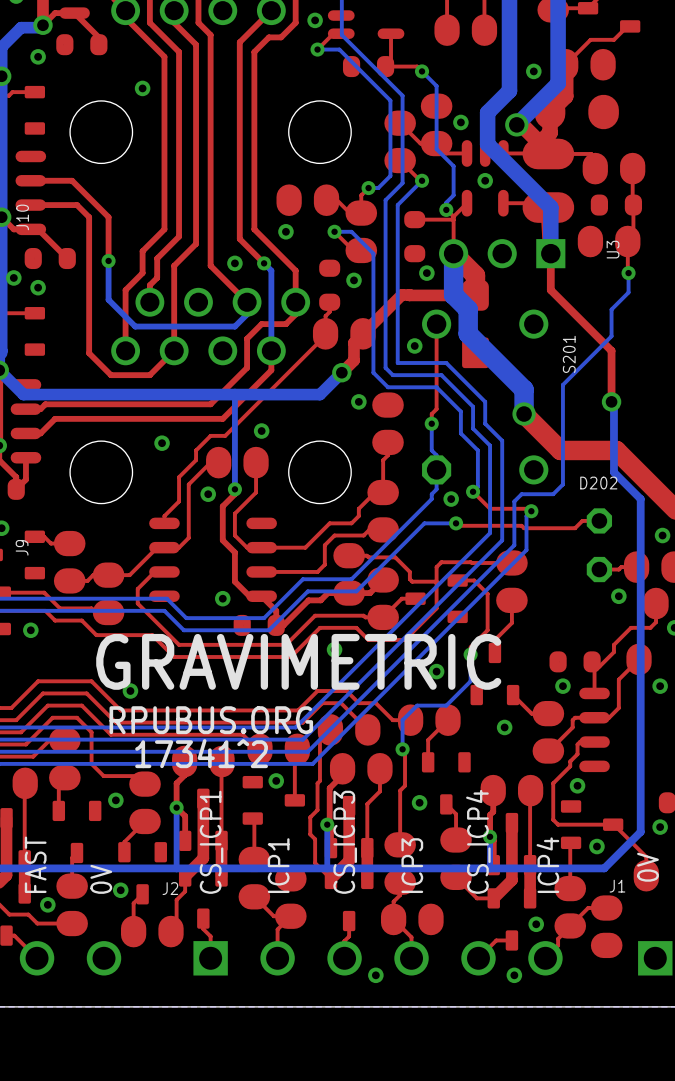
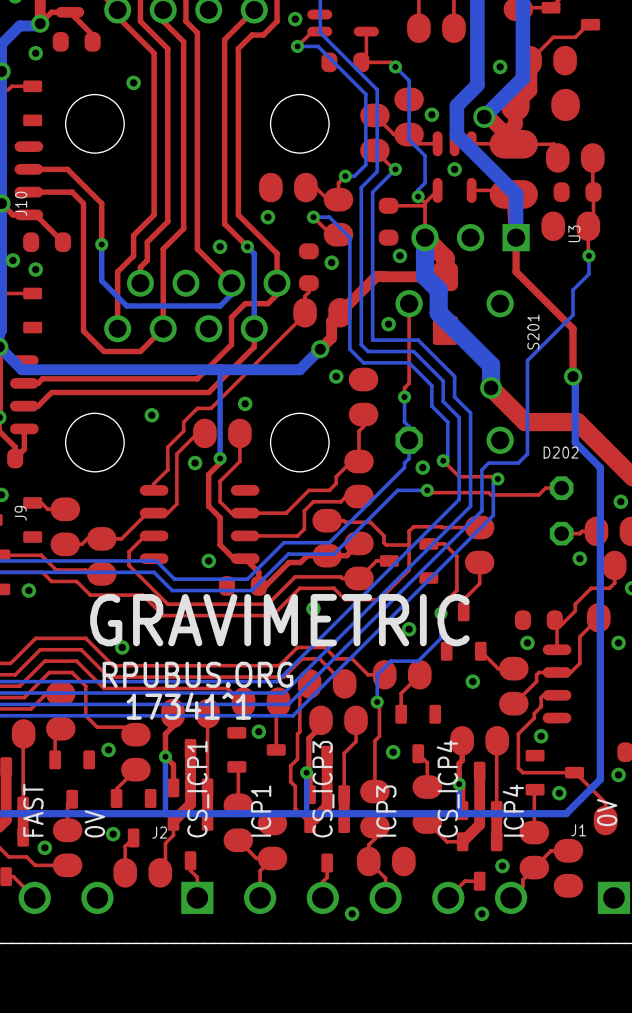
text: 17341^2 (201, 753) -> 17341^1 (188, 706)

